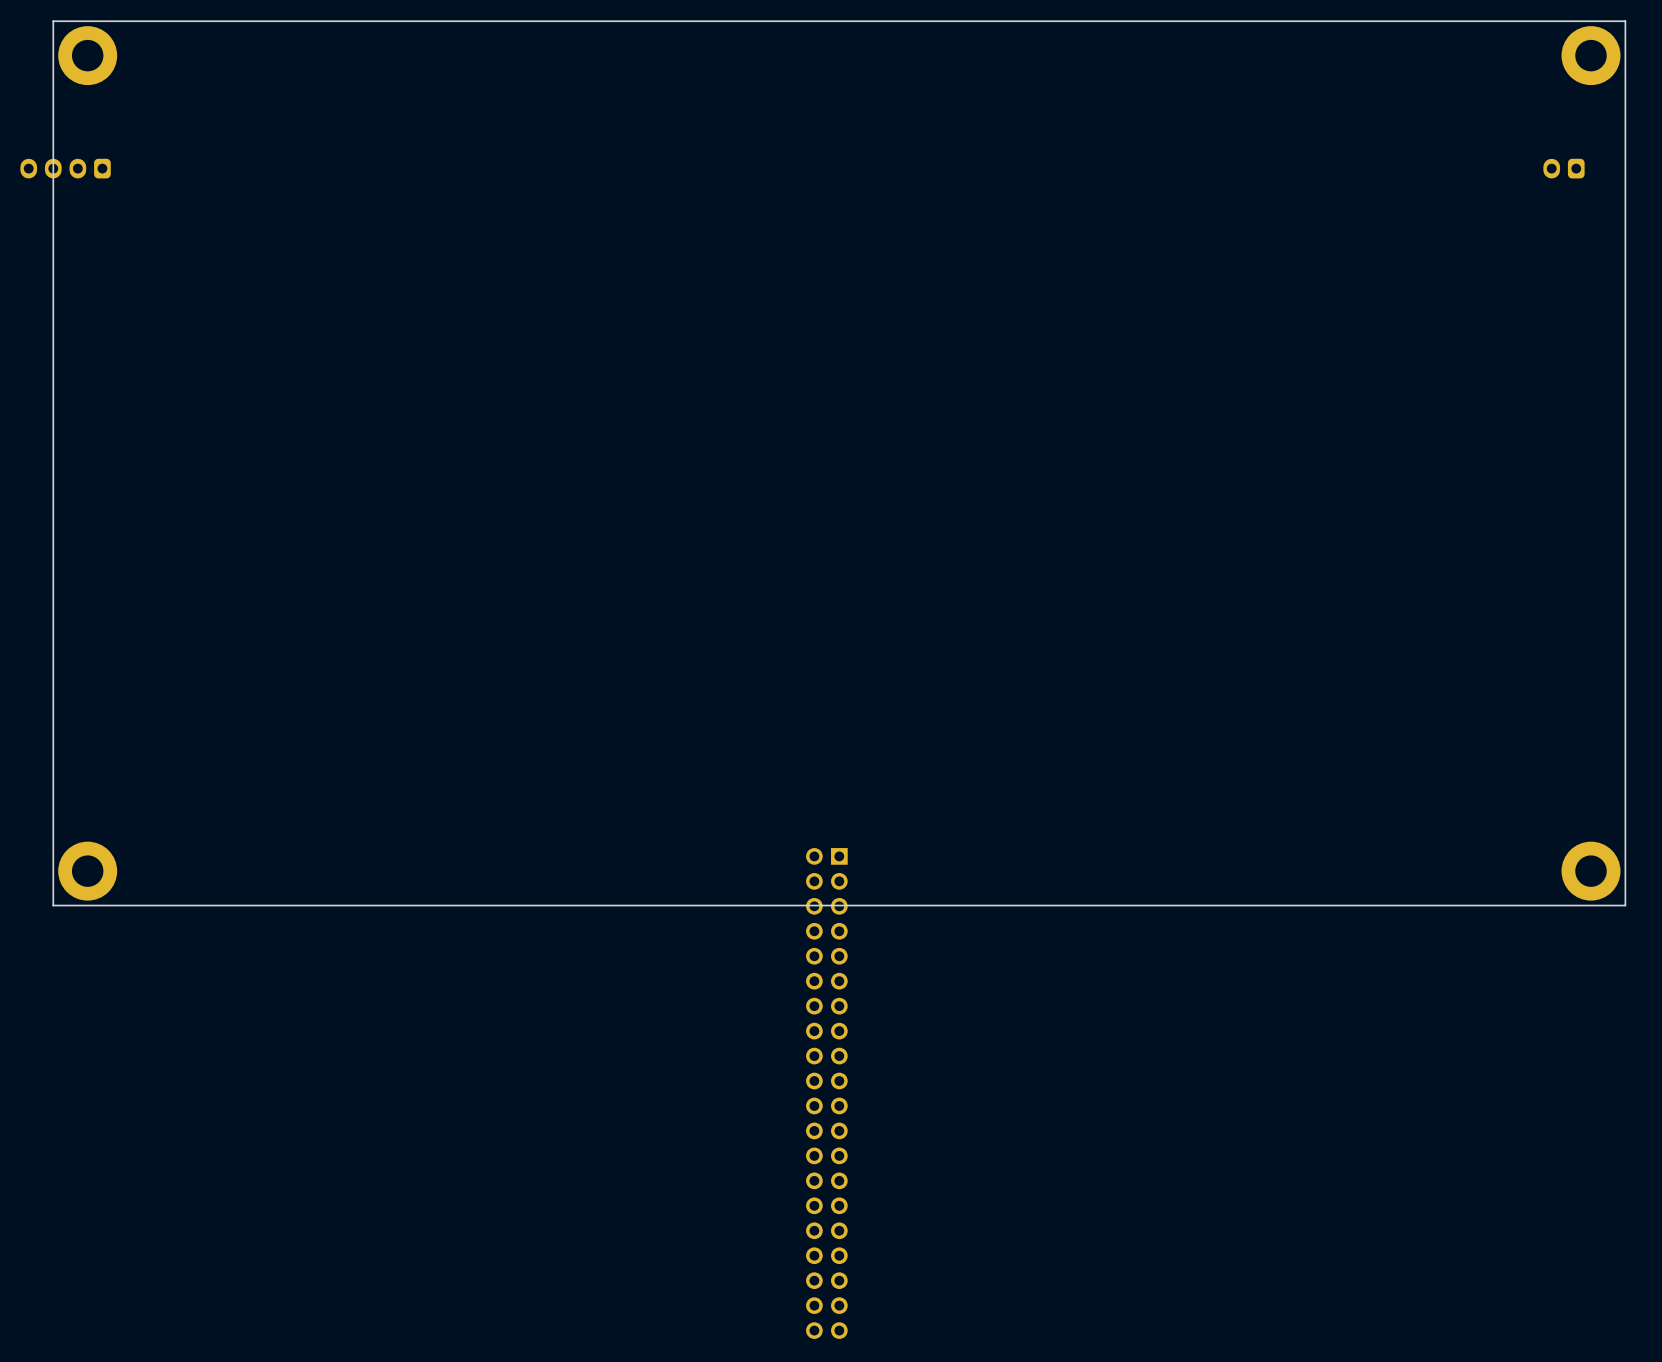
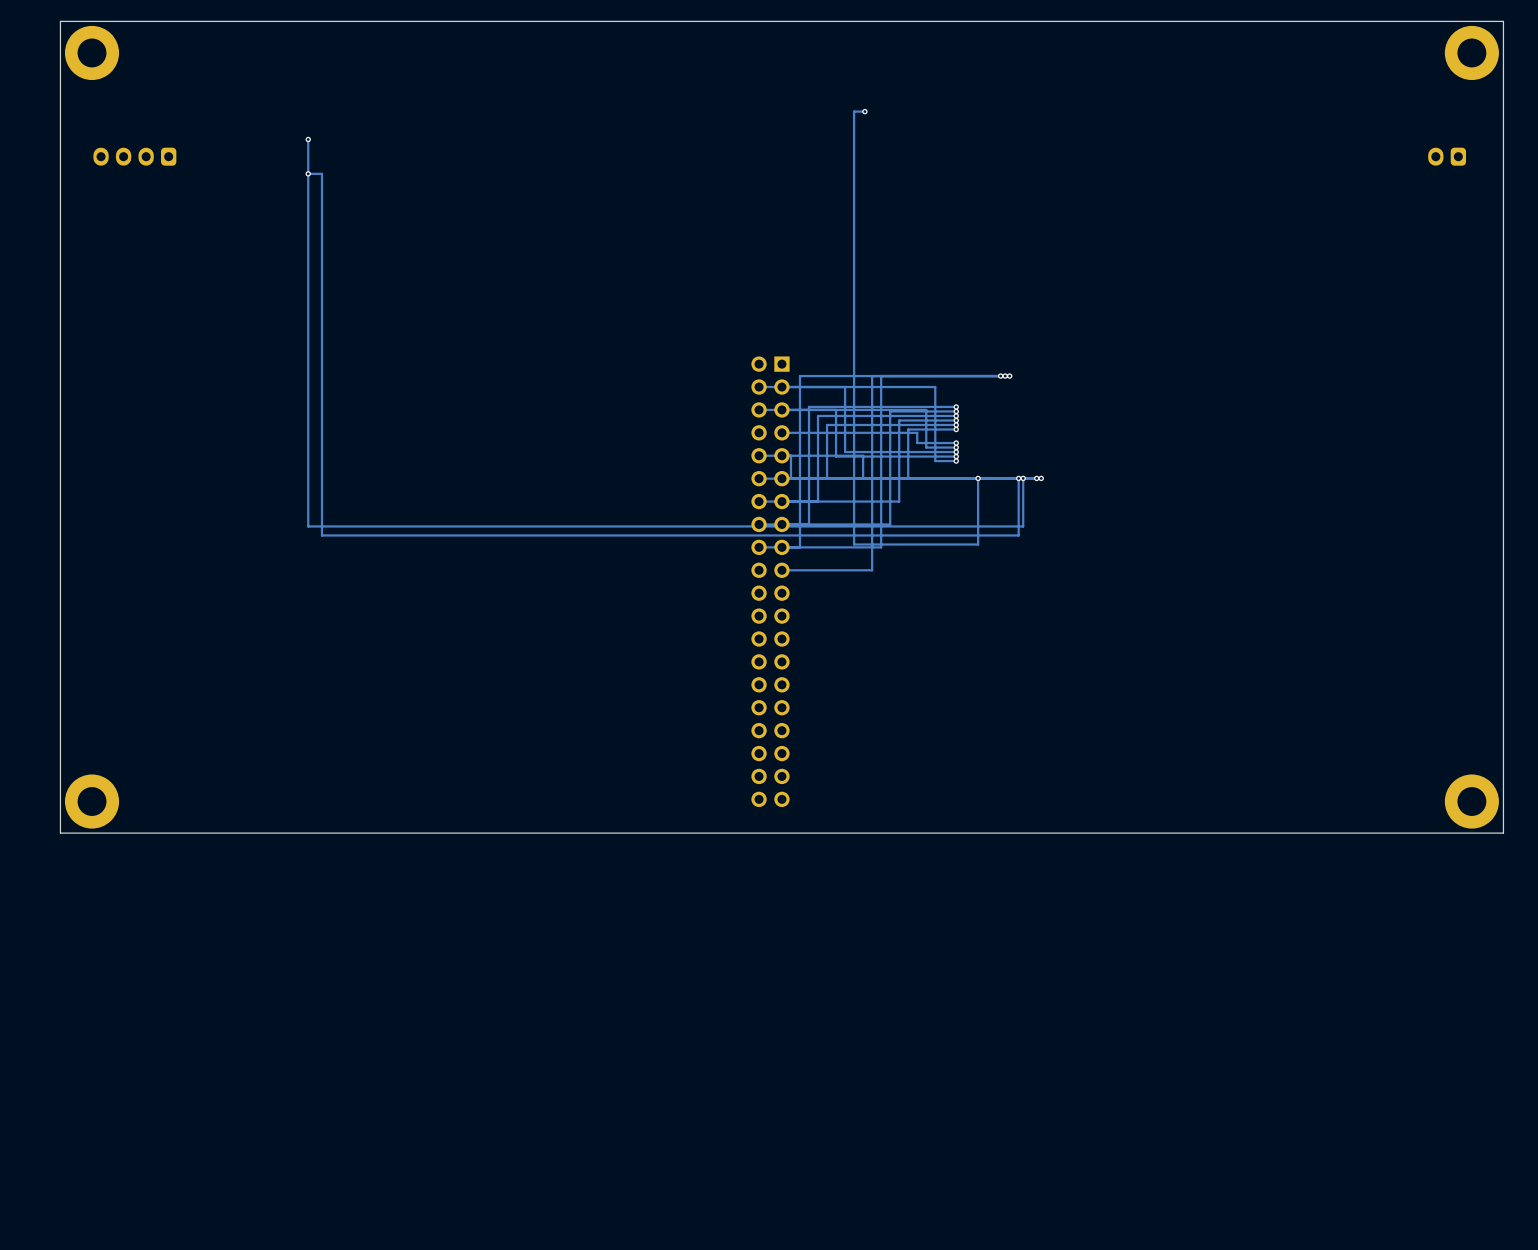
track: none -> (864, 111) (854, 111) (854, 544) (978, 544) (978, 478)
via: none -> (864, 111)
track: none -> (308, 139) (308, 526) (1023, 526) (1023, 478)
via: none -> (308, 139)
part position: (65, 168) -> (134, 156)
track: none -> (308, 173) (322, 173) (322, 535) (1018, 535) (1018, 478)
via: none -> (308, 173)
track: none -> (872, 376) (872, 570) (781, 570)
track: none -> (881, 376) (881, 547) (759, 547)
via: none -> (1000, 376)
via: none -> (1005, 376)
track: none -> (1009, 376) (799, 376) (799, 547)
via: none -> (1009, 376)
track: none -> (759, 387) (935, 387) (935, 461) (956, 461)
track: none -> (845, 387) (845, 452) (956, 452)
track: none -> (956, 406) (809, 406) (809, 524)
via: none -> (956, 406)
track: none -> (759, 409) (926, 409) (926, 447) (956, 447)
track: none -> (836, 409) (836, 456) (956, 456)
track: none -> (956, 411) (890, 411) (890, 524) (759, 524)
via: none -> (956, 411)
track: none -> (956, 415) (818, 415) (818, 501)
via: none -> (956, 415)
track: none -> (956, 420) (899, 420) (899, 501) (759, 501)
via: none -> (956, 420)
track: none -> (956, 424) (827, 424) (827, 478)
via: none -> (956, 424)
track: none -> (956, 429) (908, 429) (908, 478) (759, 478)
via: none -> (956, 429)
track: none -> (781, 432) (917, 432) (917, 443) (956, 443)
via: none -> (956, 443)
via: none -> (956, 447)
via: none -> (956, 452)
track: none -> (759, 455) (863, 455) (863, 478)
track: none -> (790, 455) (790, 478) (1041, 478)
via: none -> (956, 456)
via: none -> (956, 461)
via: none -> (978, 478)
via: none -> (1018, 478)
via: none -> (1023, 478)
via: none -> (1036, 478)
via: none -> (1041, 478)
part: none -> (770, 581)
part: (826, 1093) -> none

